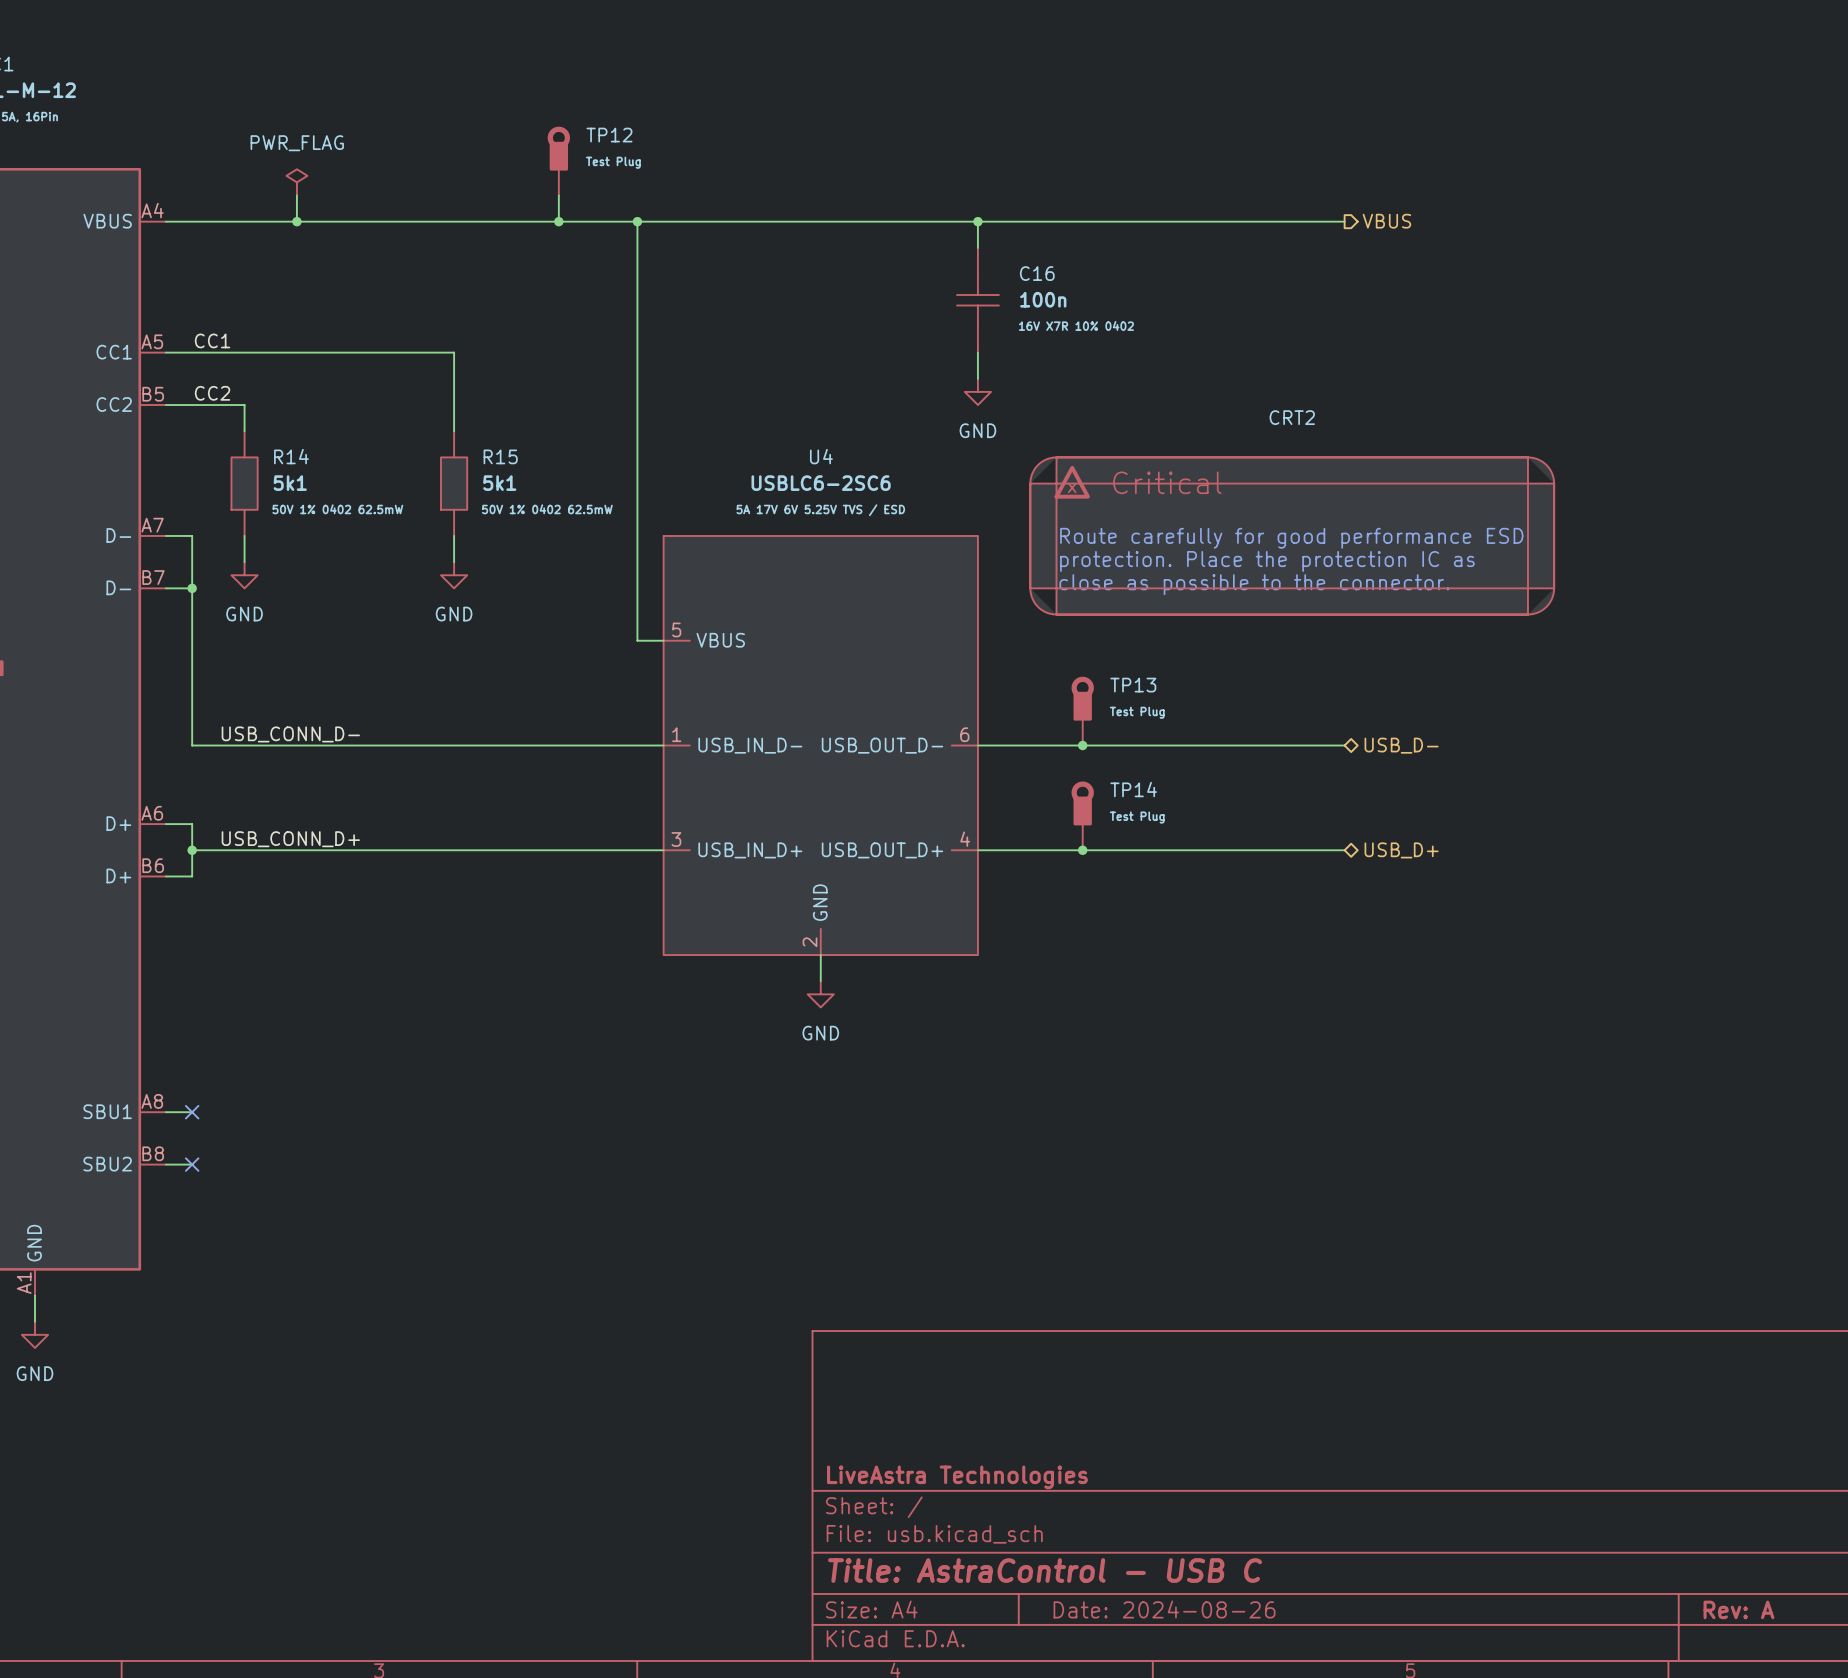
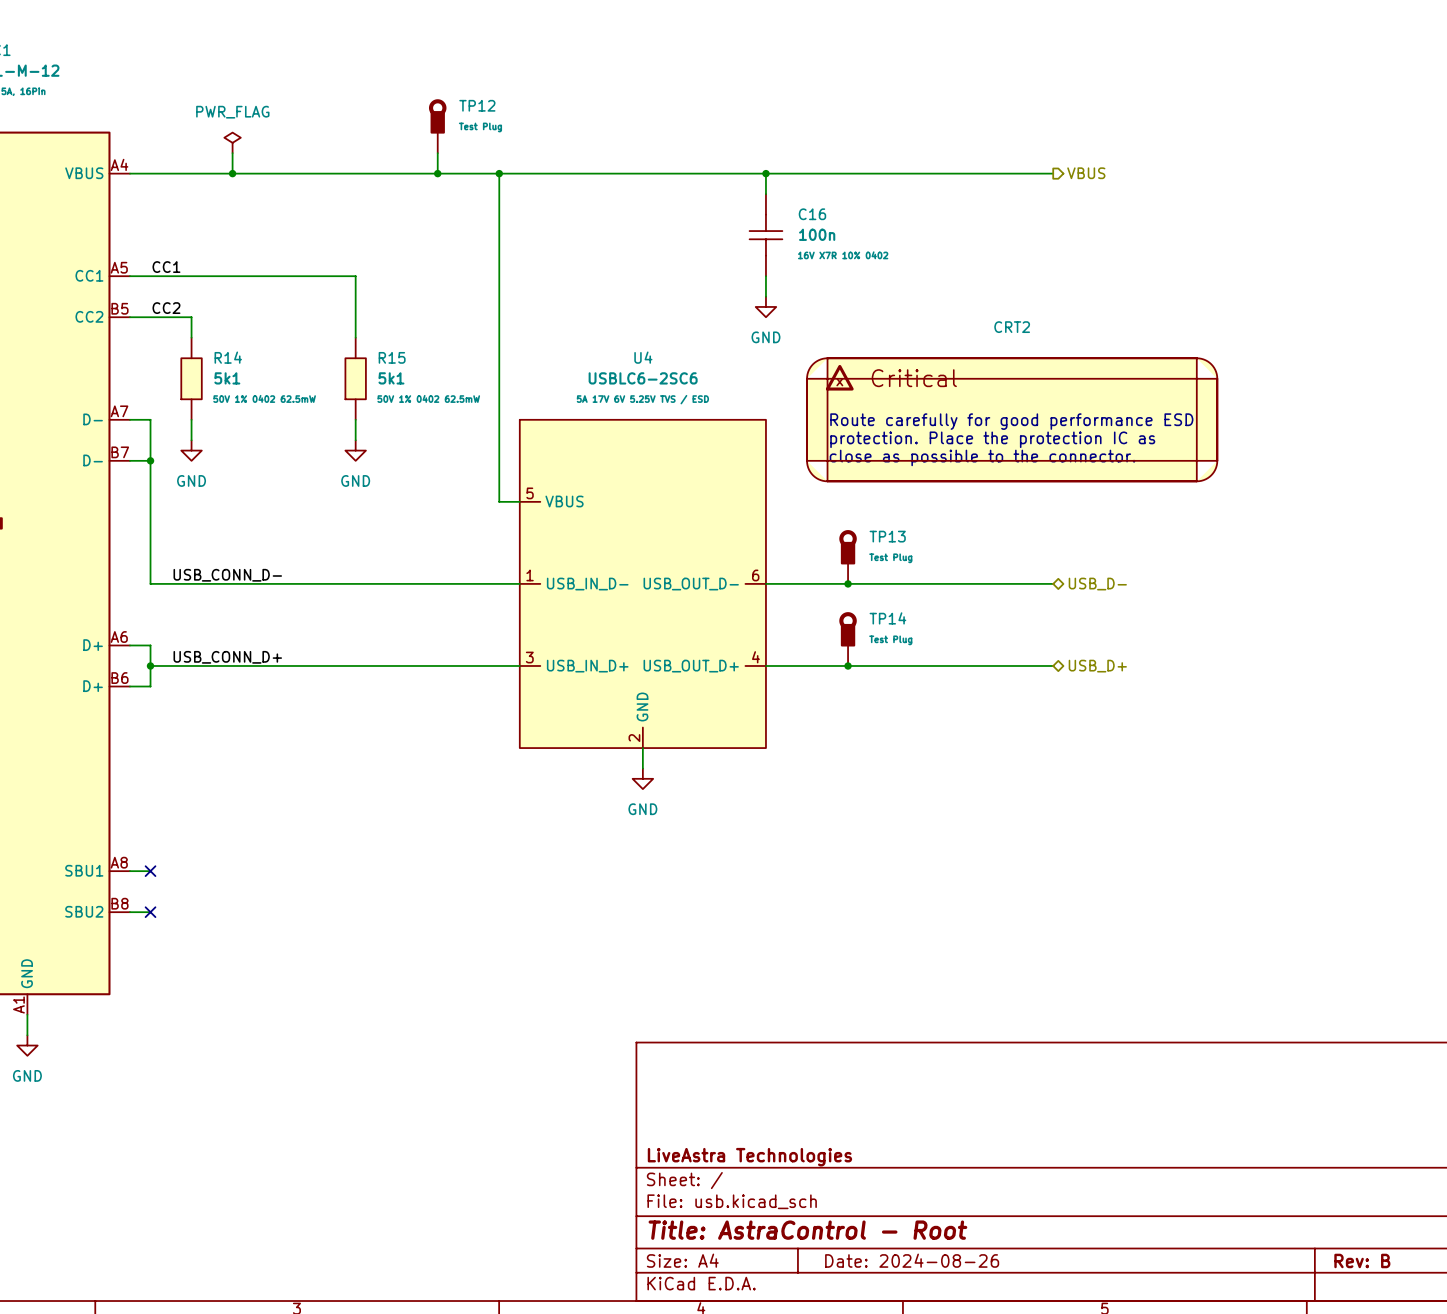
title block: Title: AstraControl - USB C (1045, 1570) -> Title: AstraControl - Root (807, 1230)
title block: Rev: A (1738, 1609) -> Rev: B (1362, 1260)

